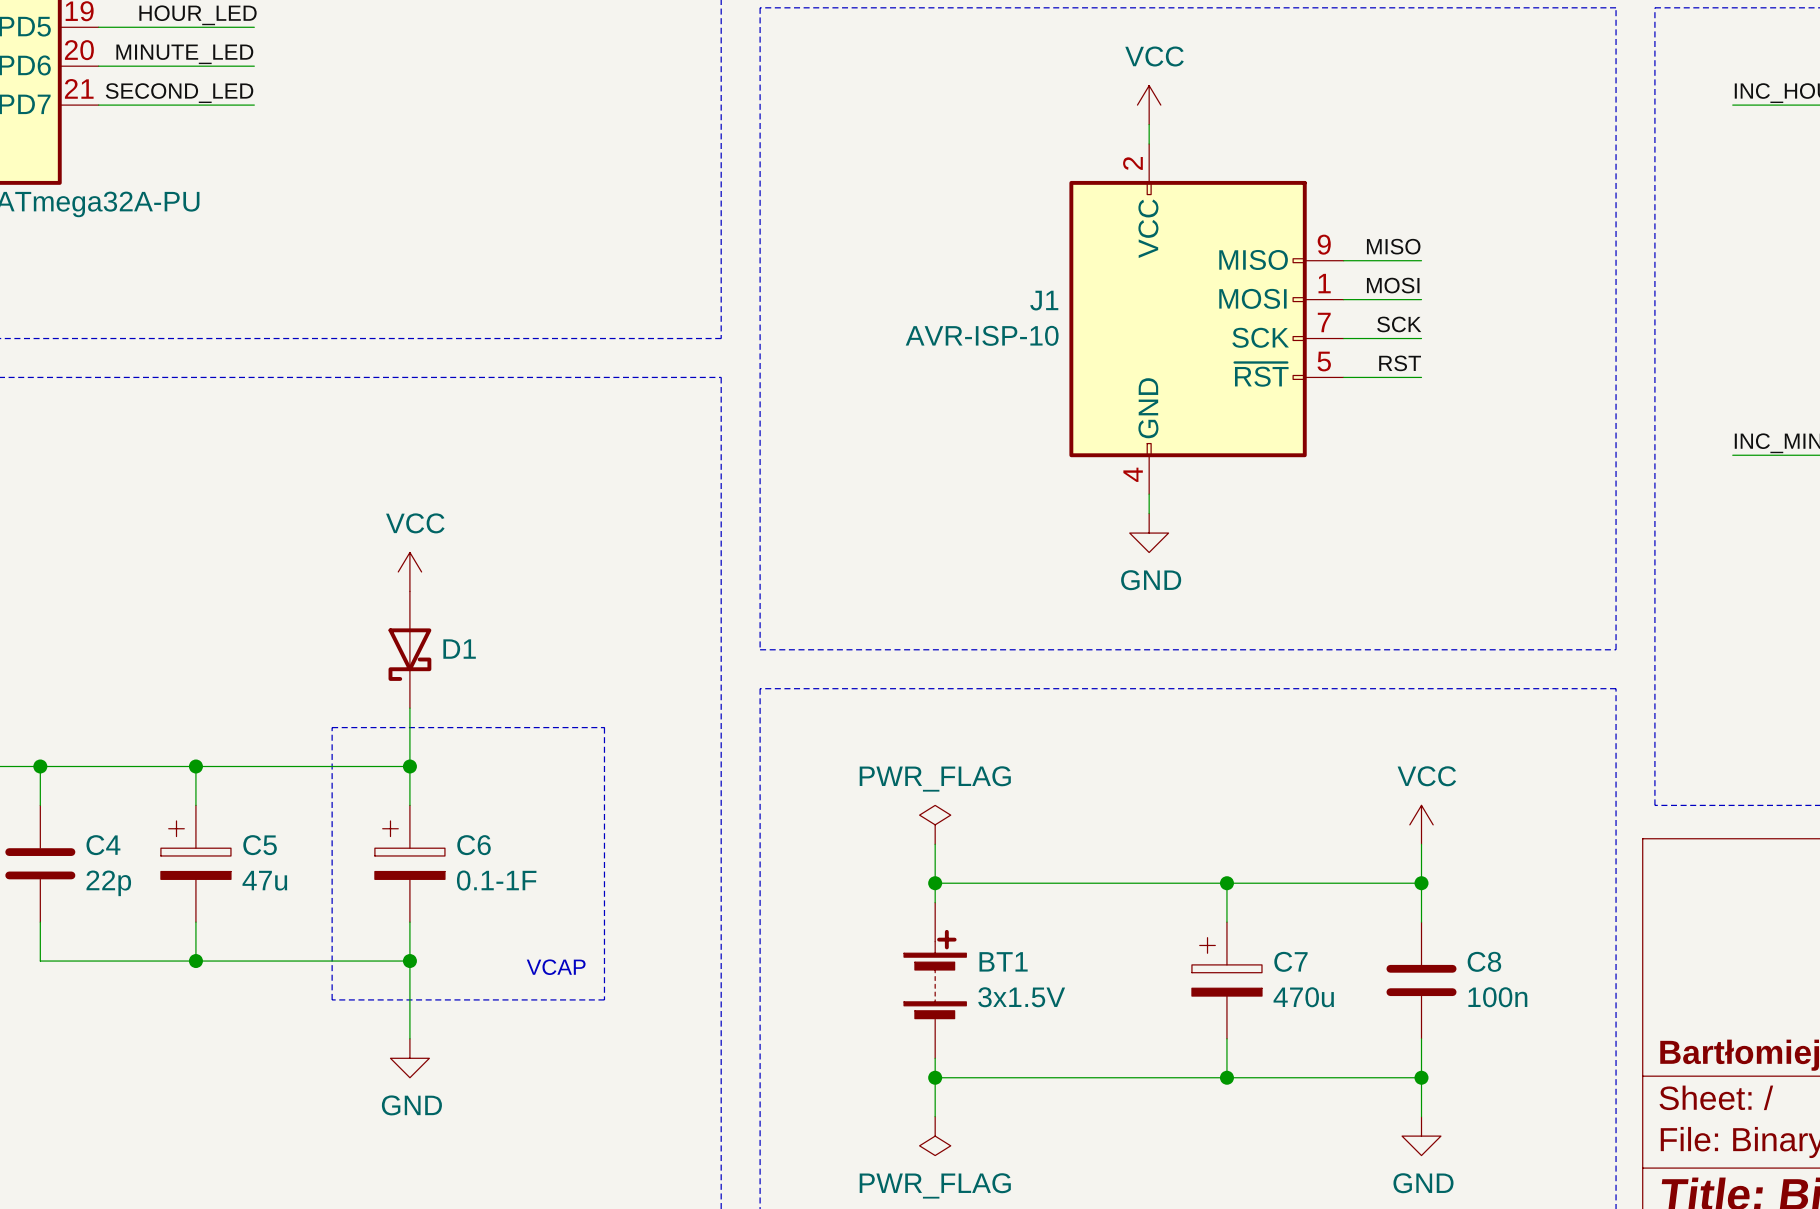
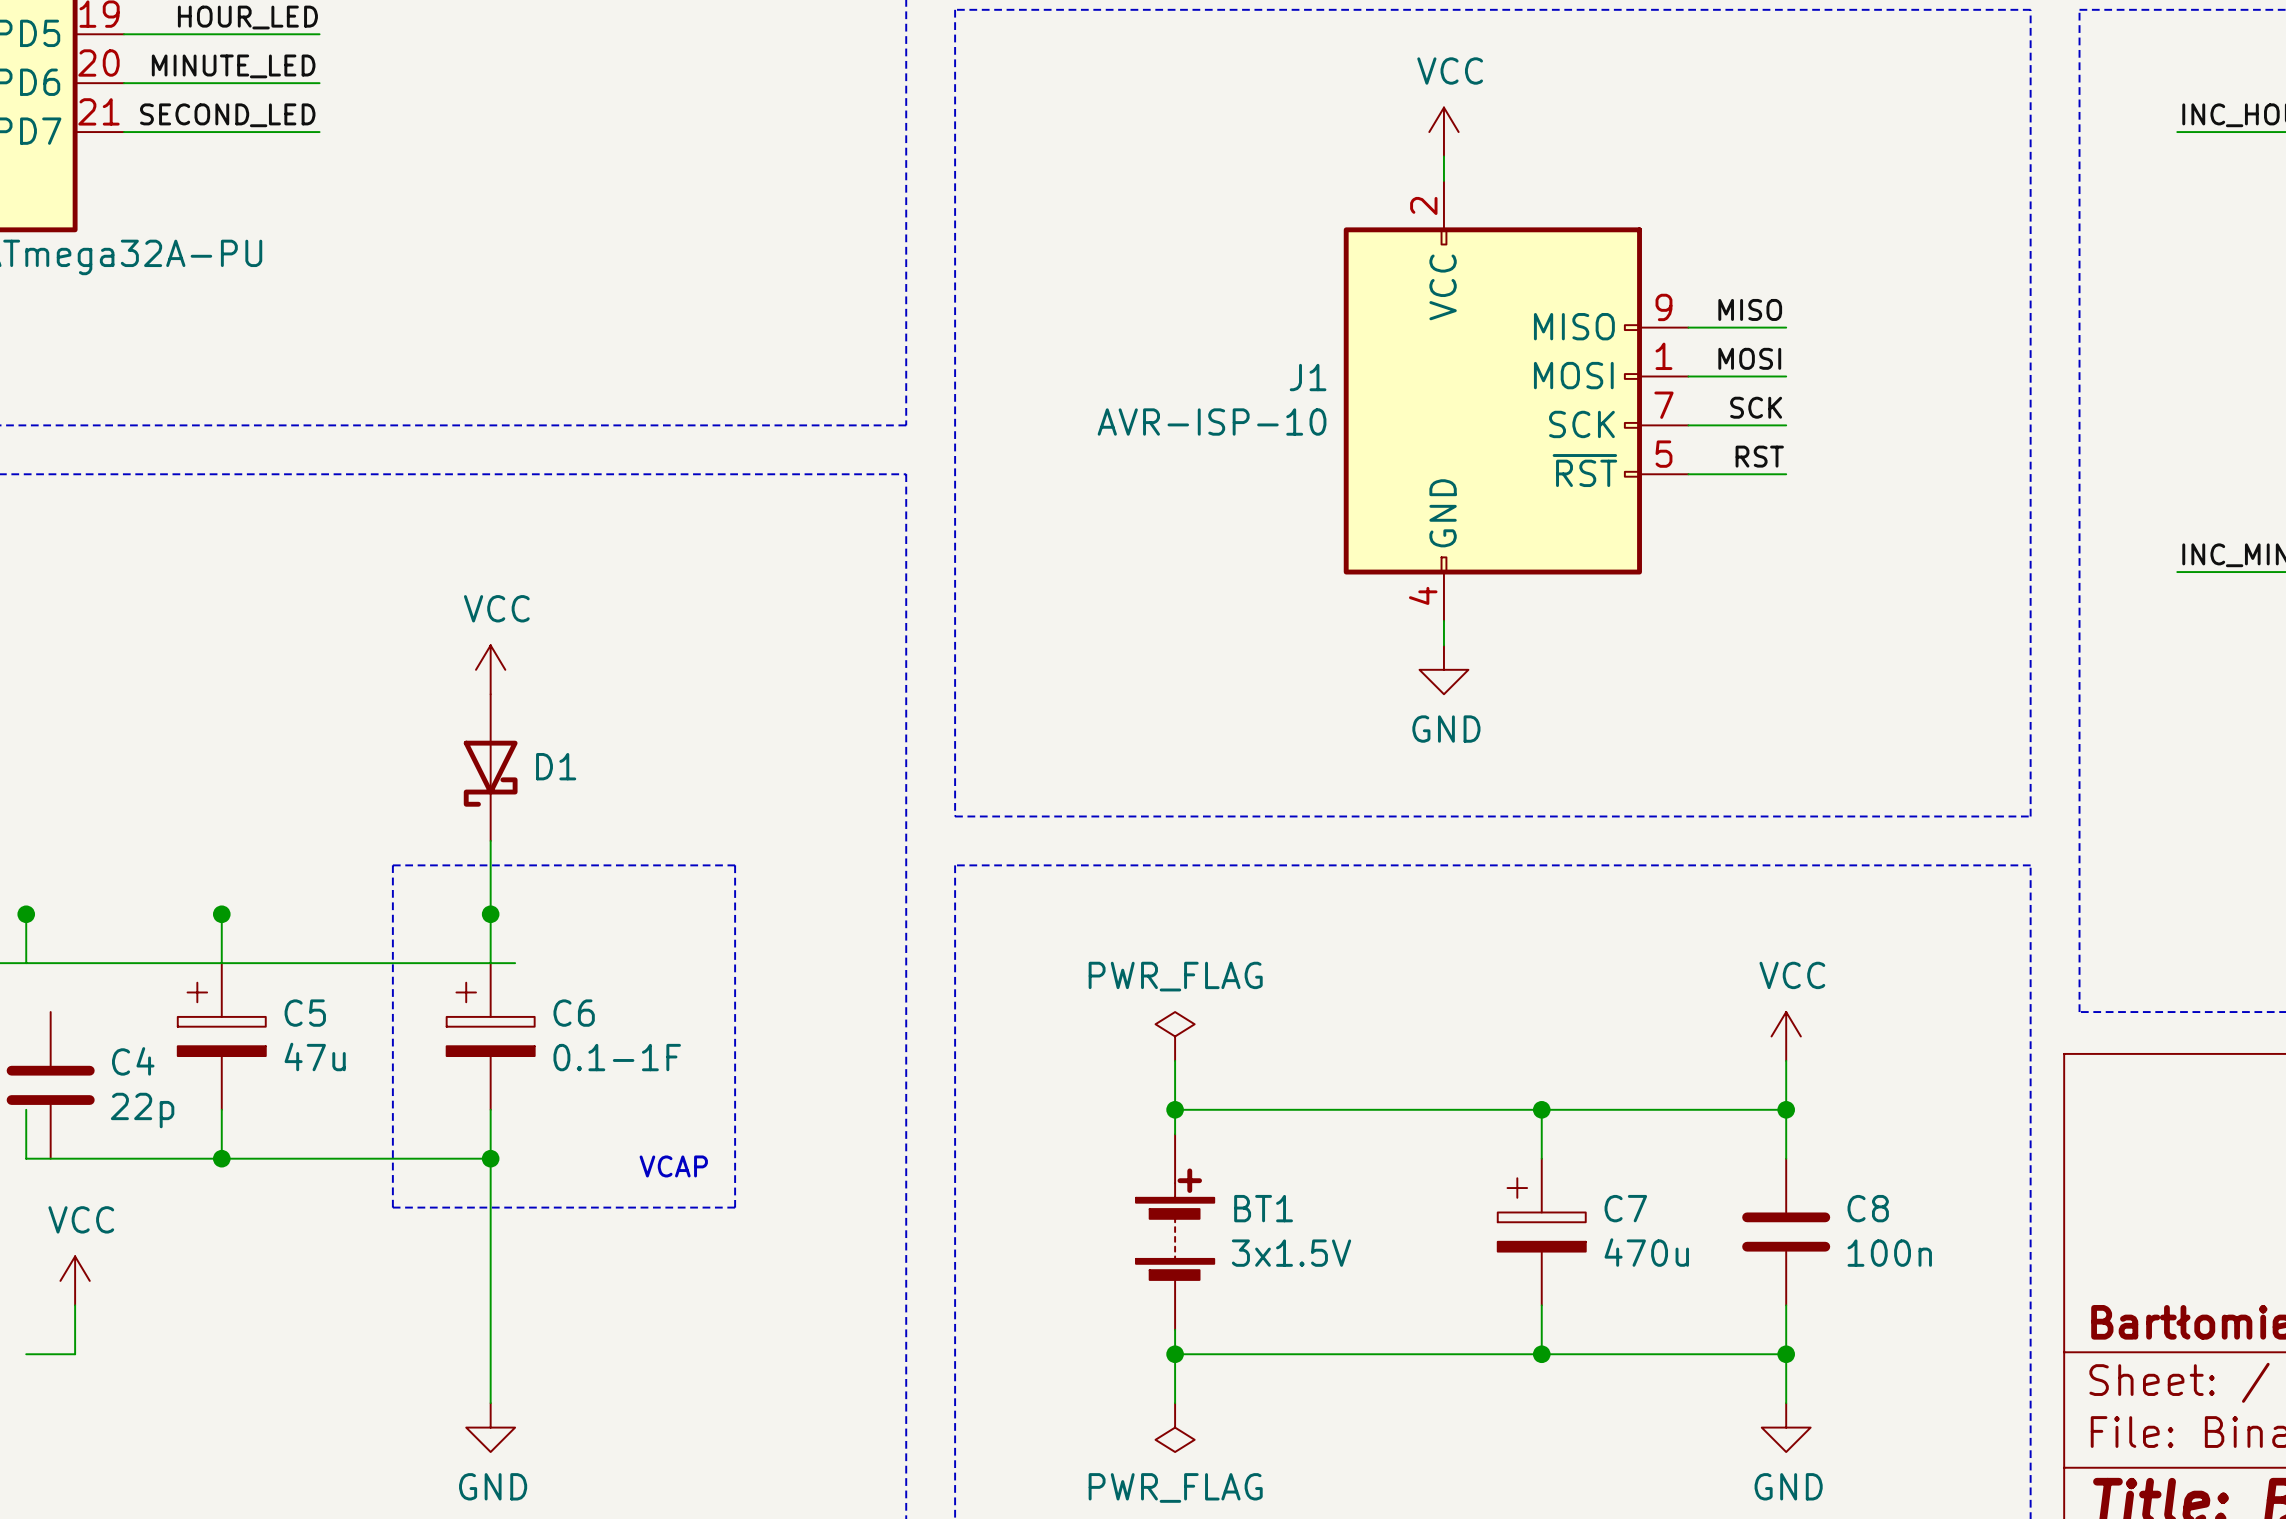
power symbol position: VCC (409, 571) -> VCC (490, 669)
D1 position: (409, 649) -> (490, 767)
wire: (409, 708) (409, 805) -> (490, 840) (490, 963)
line: (332, 727) (604, 727) (604, 999) (332, 999) (332, 727) -> (392, 865) (735, 865) (735, 1207) (392, 1207) (392, 865)
wire: (40, 766) (40, 805) -> (26, 914) (26, 963)
junction position: (40, 766) -> (26, 914)
wire: (195, 766) (195, 805) -> (221, 914) (221, 963)
junction position: (195, 766) -> (221, 914)
junction position: (409, 766) -> (490, 914)
C5 position: (195, 863) -> (221, 1036)
C6 position: (409, 863) -> (490, 1036)
wire: none -> (490, 1109) (490, 1403)
wire: (40, 922) (40, 961) (409, 961) -> (26, 1109) (26, 1158) (490, 1158)
wire: (195, 922) (195, 961) -> (221, 1109) (221, 1158)
wire: (409, 922) (409, 1038) -> none
junction position: (195, 961) -> (221, 1158)
junction position: (409, 961) -> (490, 1158)
text position: VCAP (556, 967) -> VCAP (673, 1166)
power symbol: none -> VCC (75, 1280)
wire: none -> (75, 1305) (75, 1354) (26, 1354)
power symbol position: GND (409, 1058) -> GND (490, 1427)

